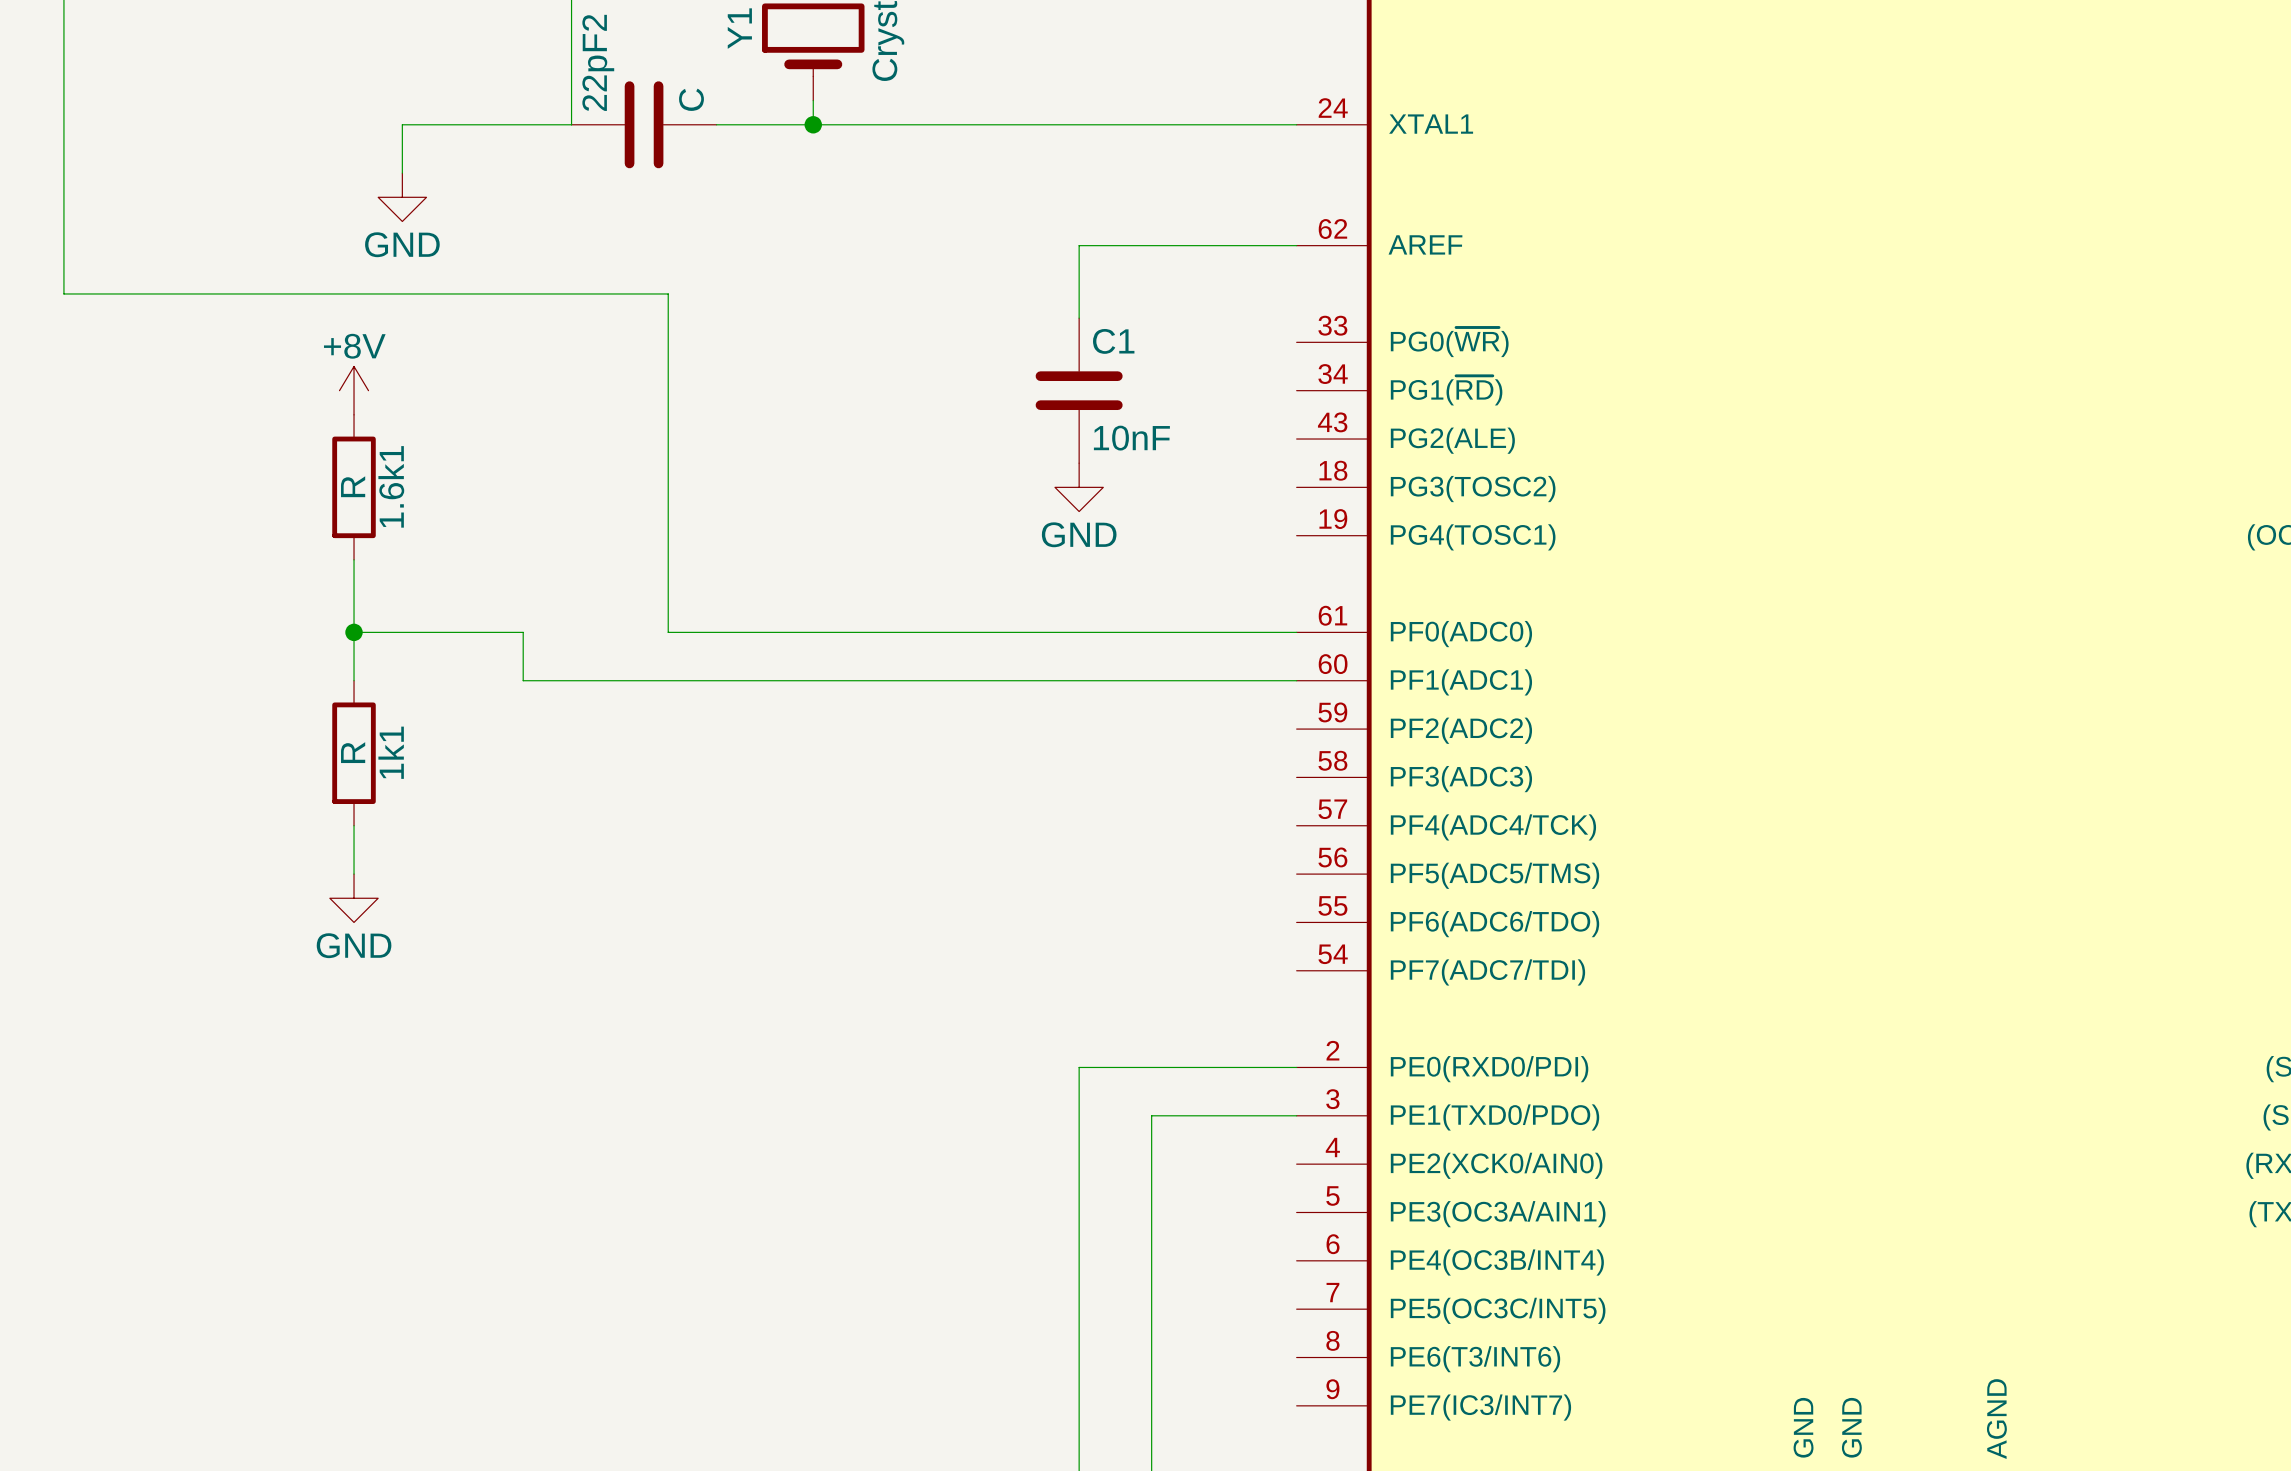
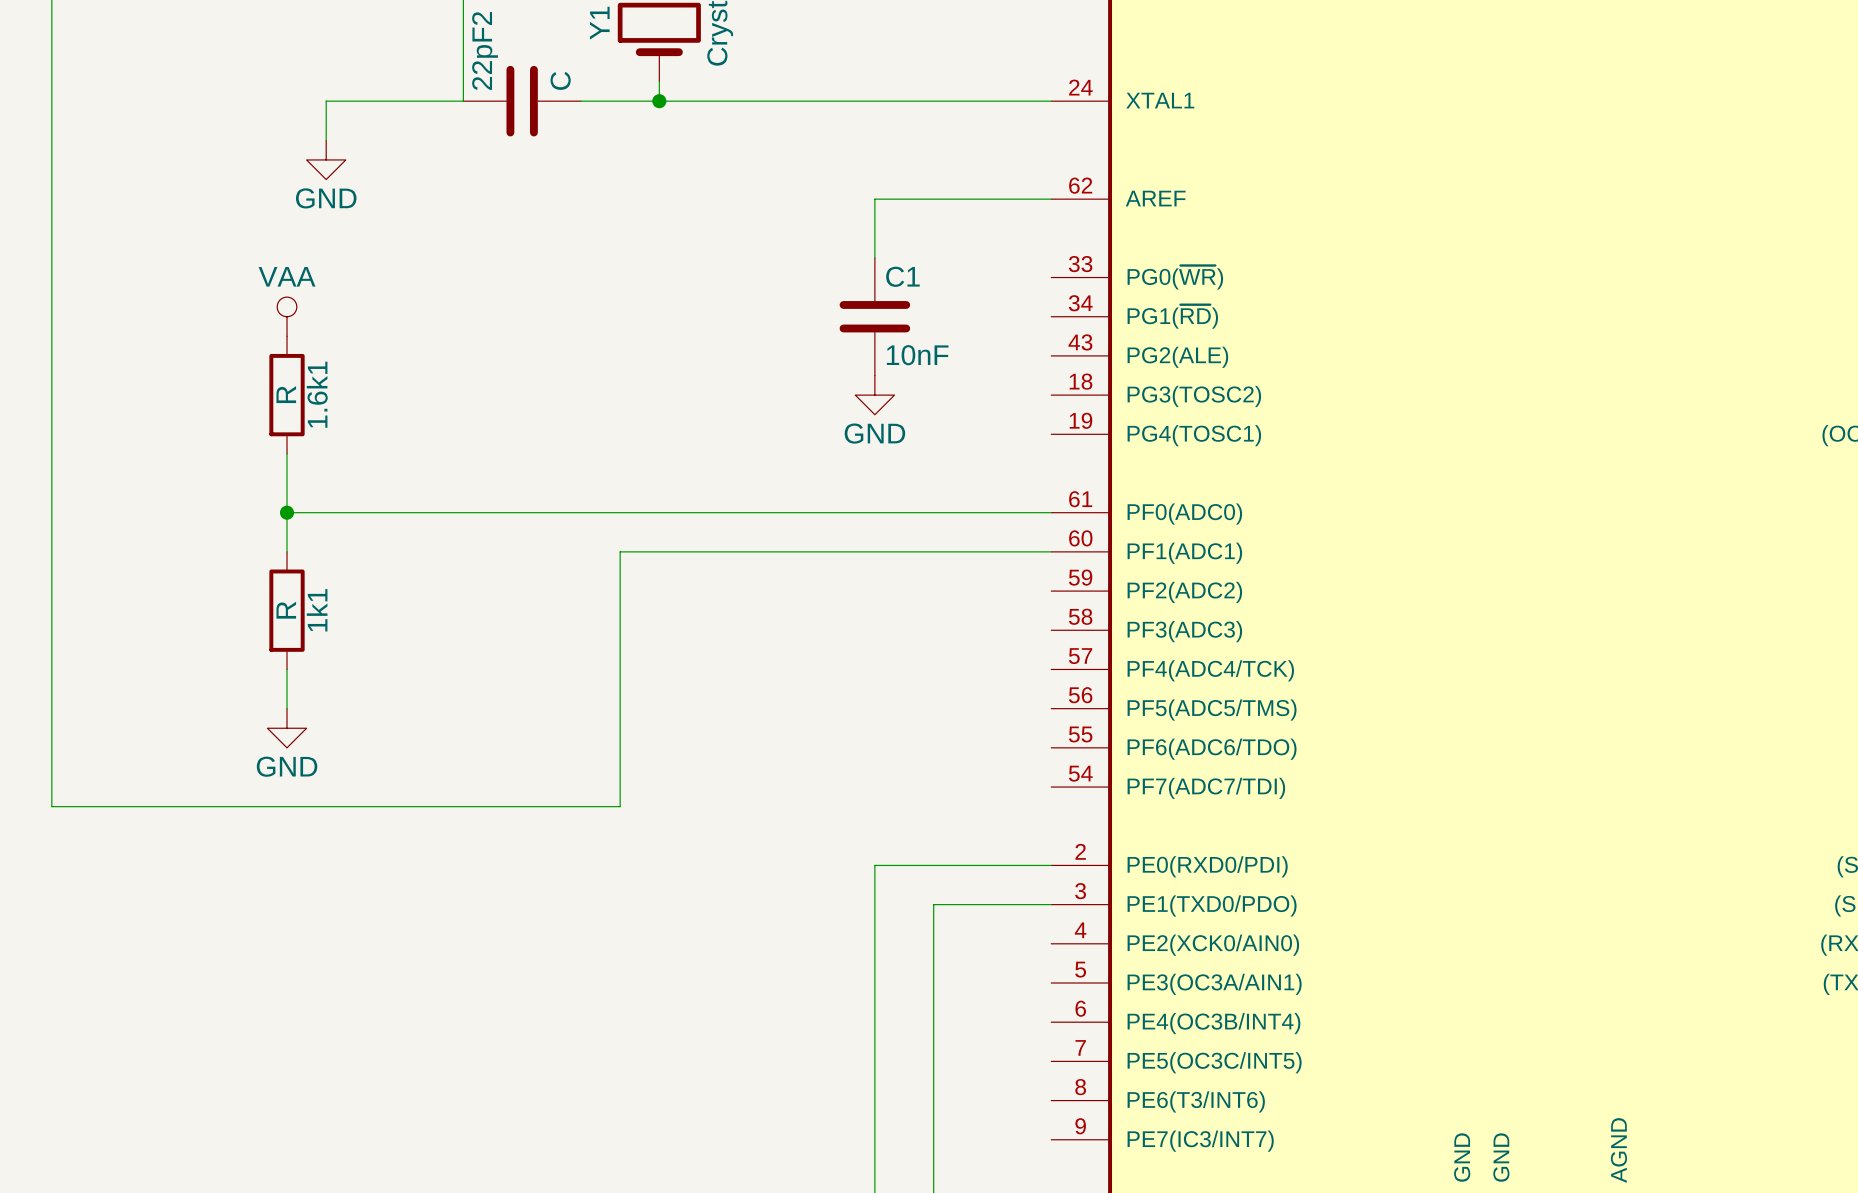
wire: (63, 293) (668, 293) (668, 632) -> (51, 238) (51, 806) (620, 806) (620, 551)
power symbol: +8V (354, 390) -> VAA (287, 316)
wire: (523, 632) (523, 680) (764, 680) -> (424, 512) (541, 512)

